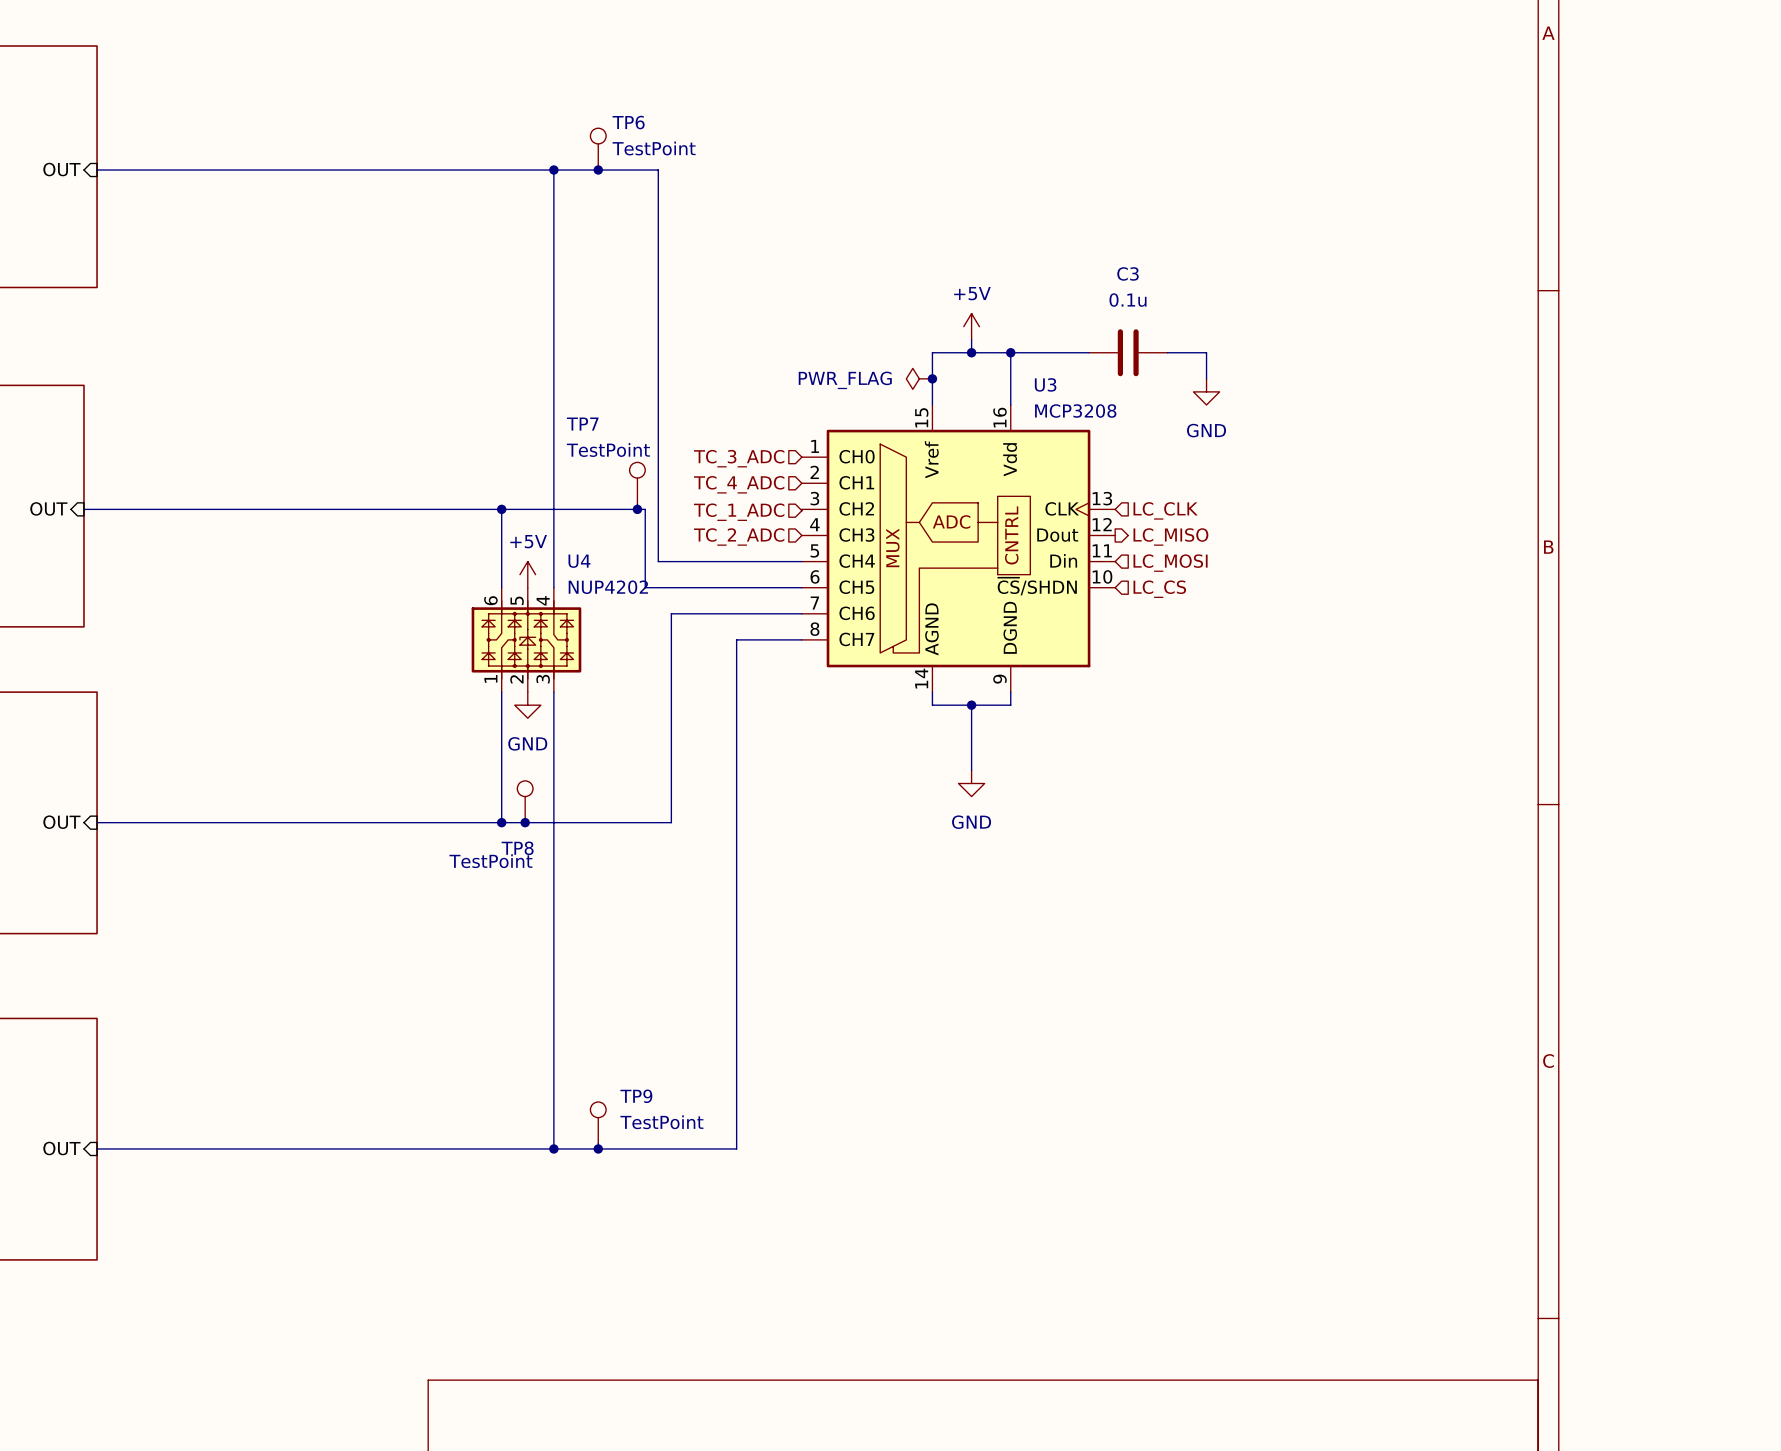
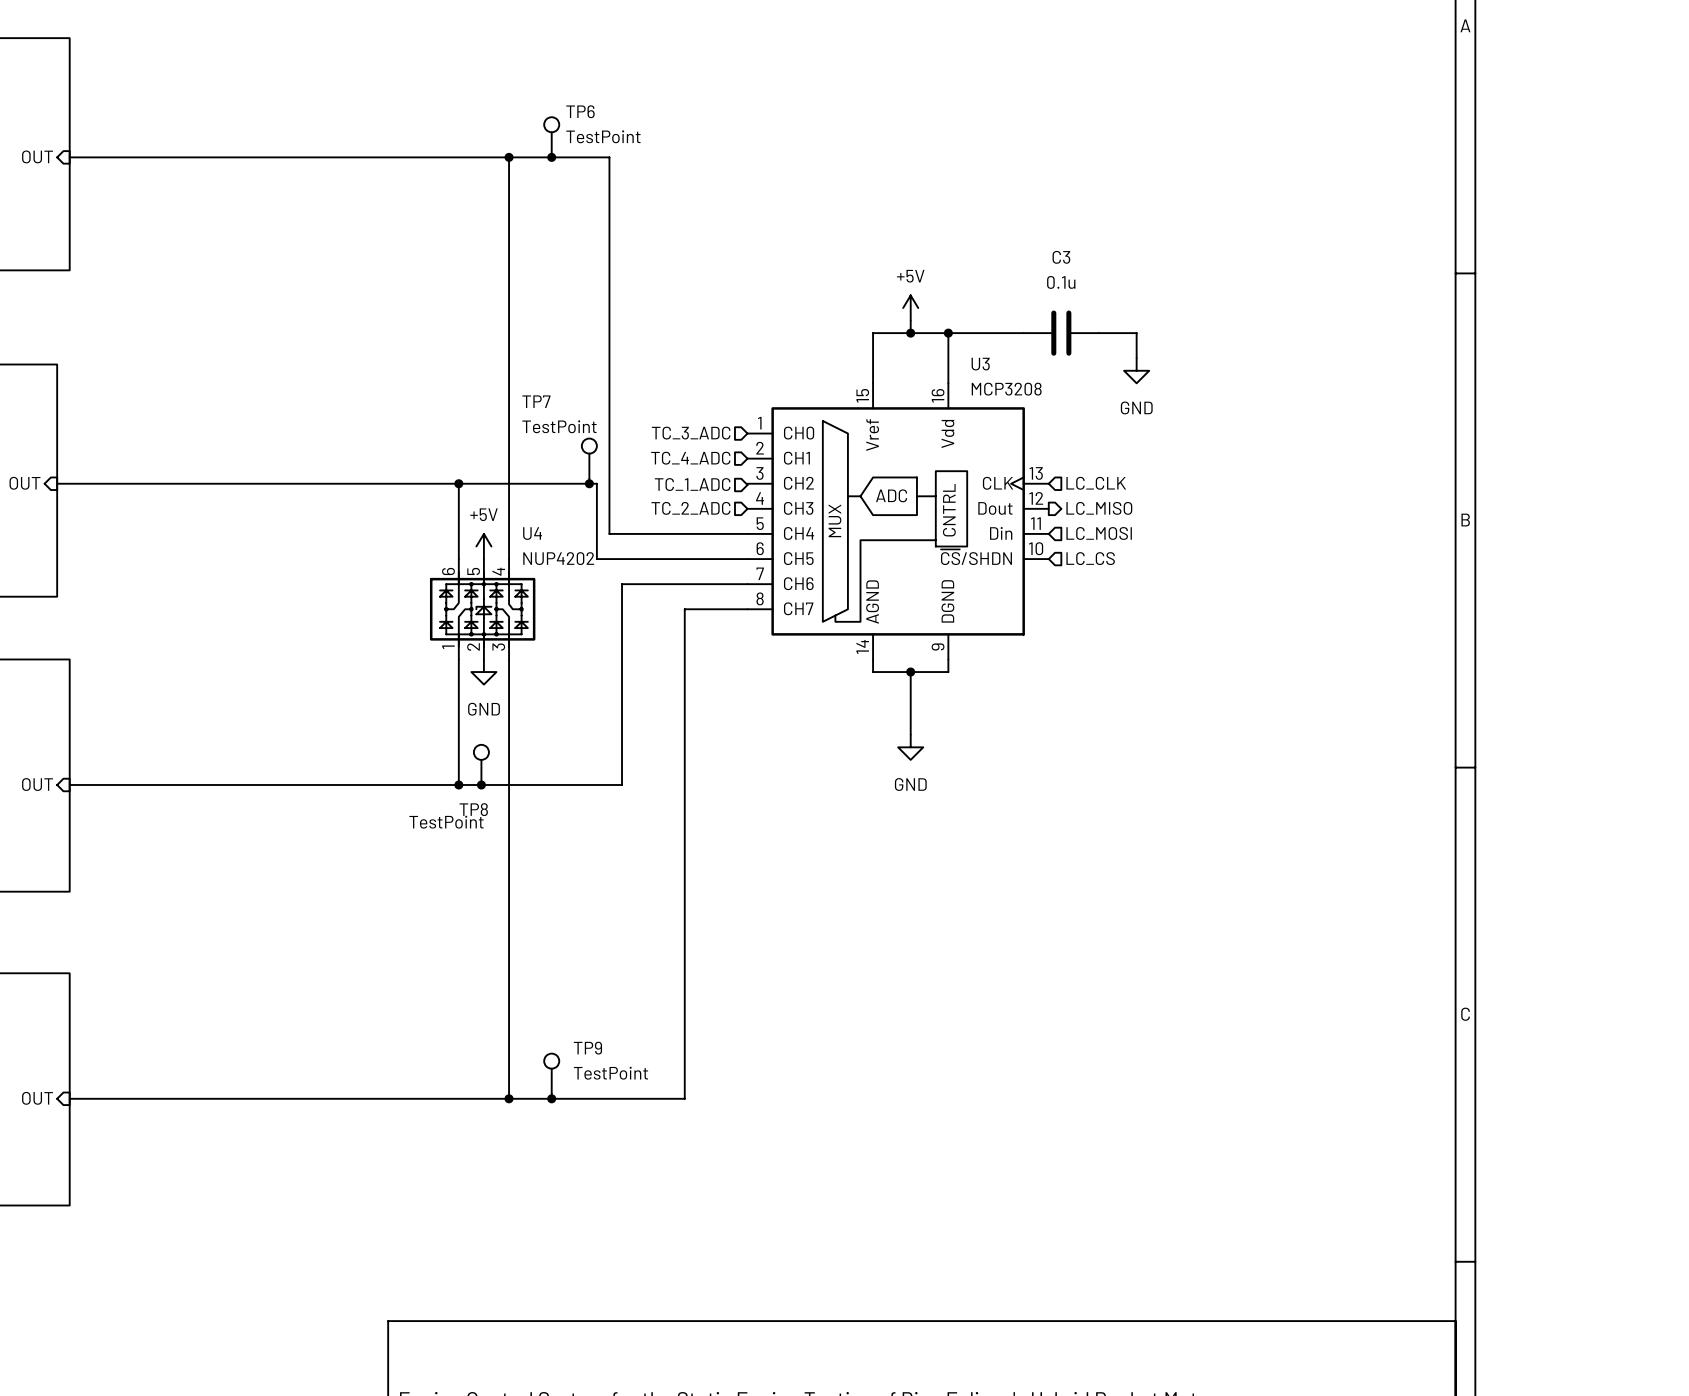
power symbol: PWR_FLAG (919, 378) -> none
junction: (932, 378) -> none

